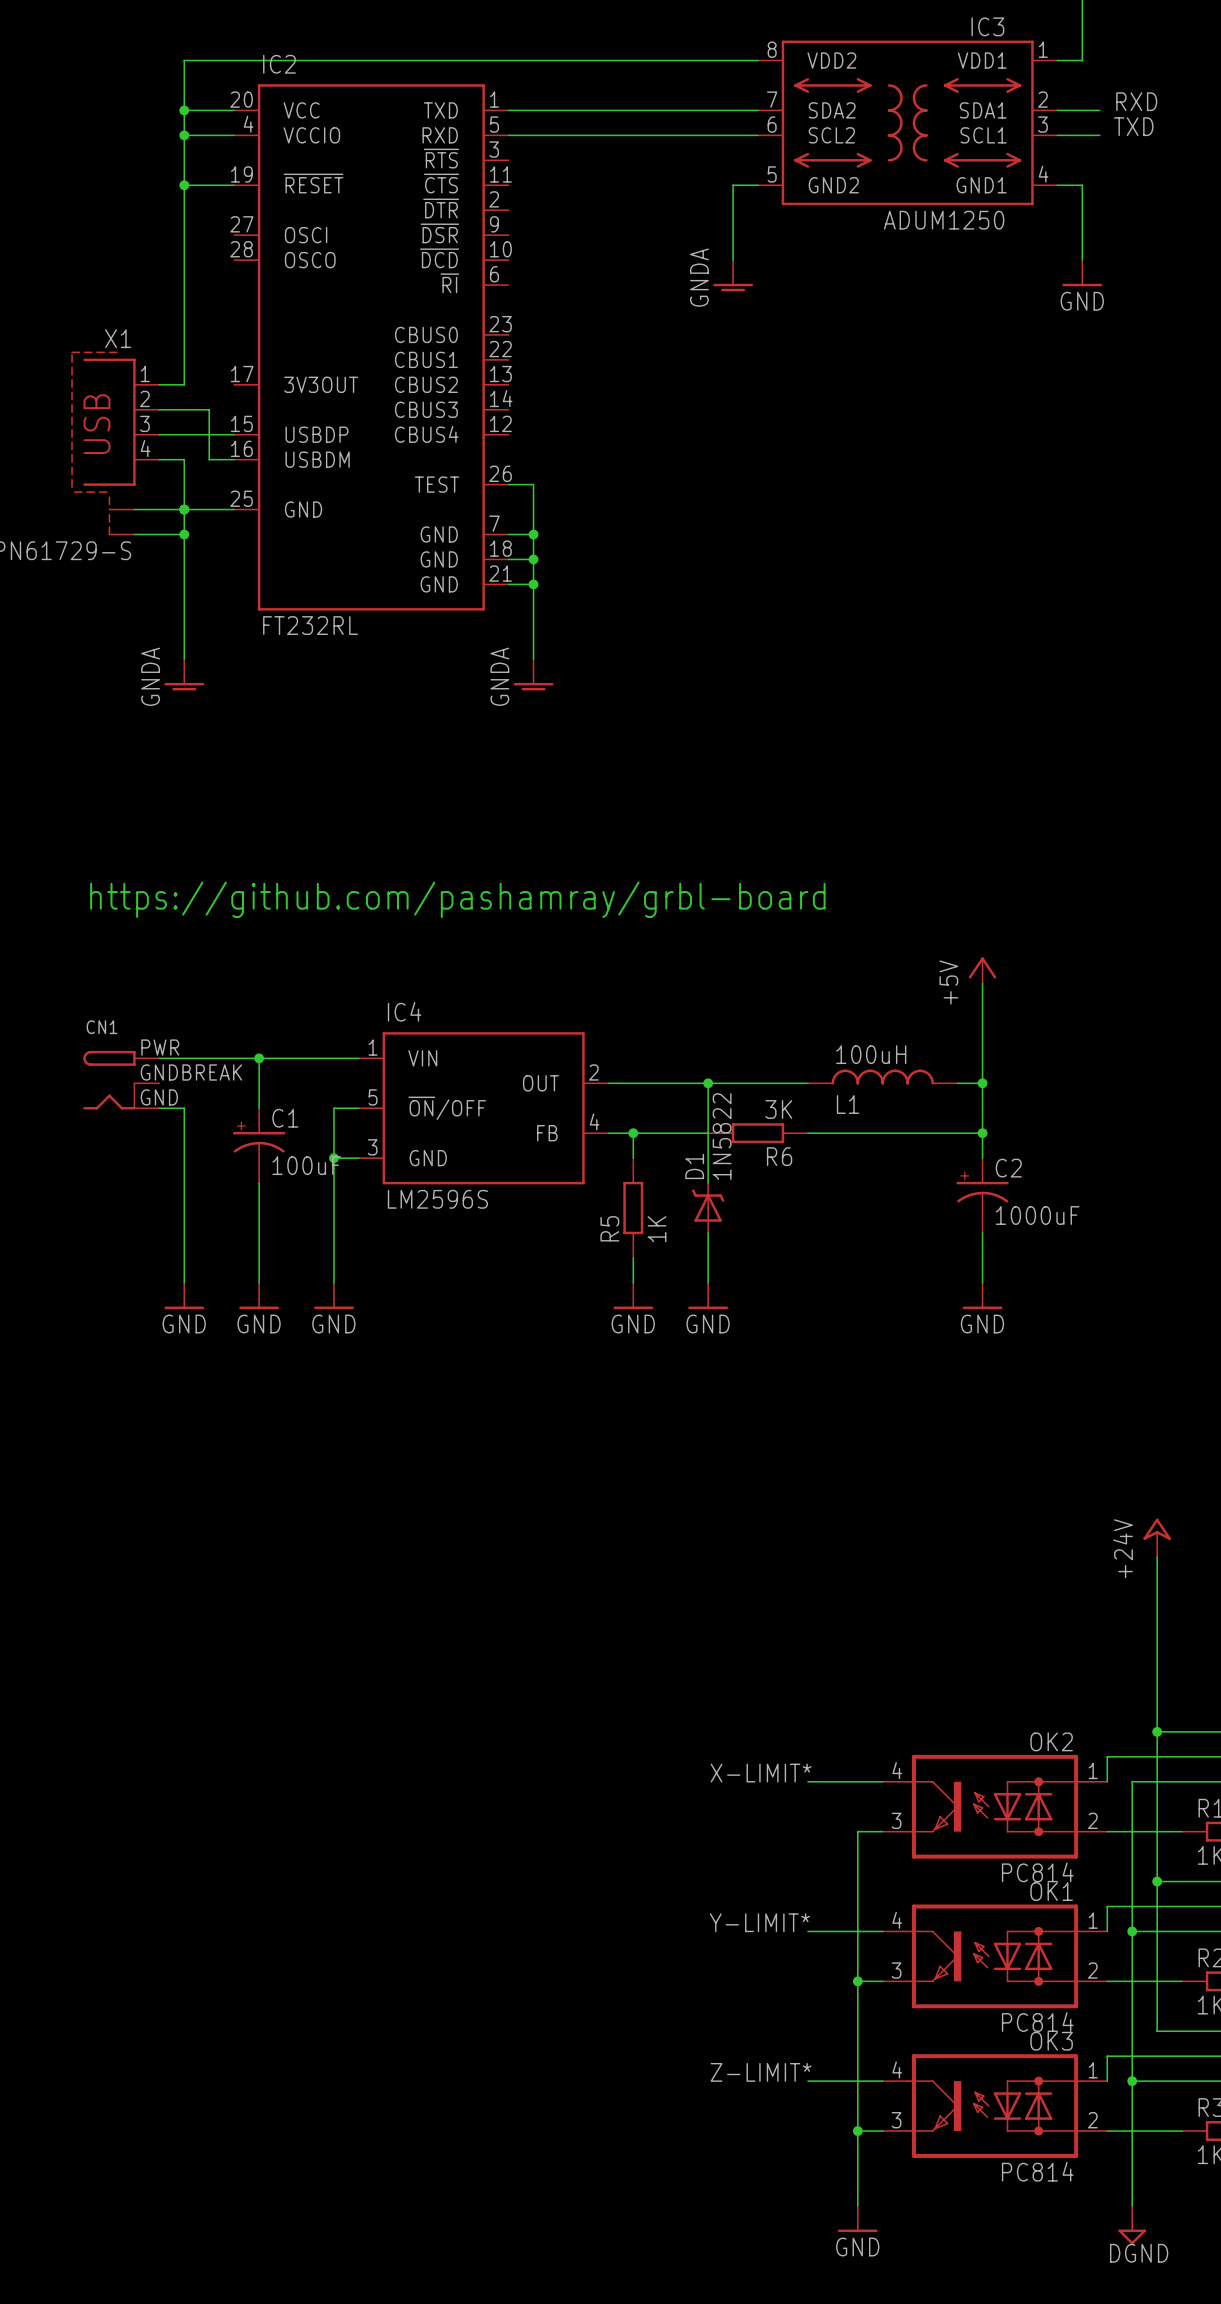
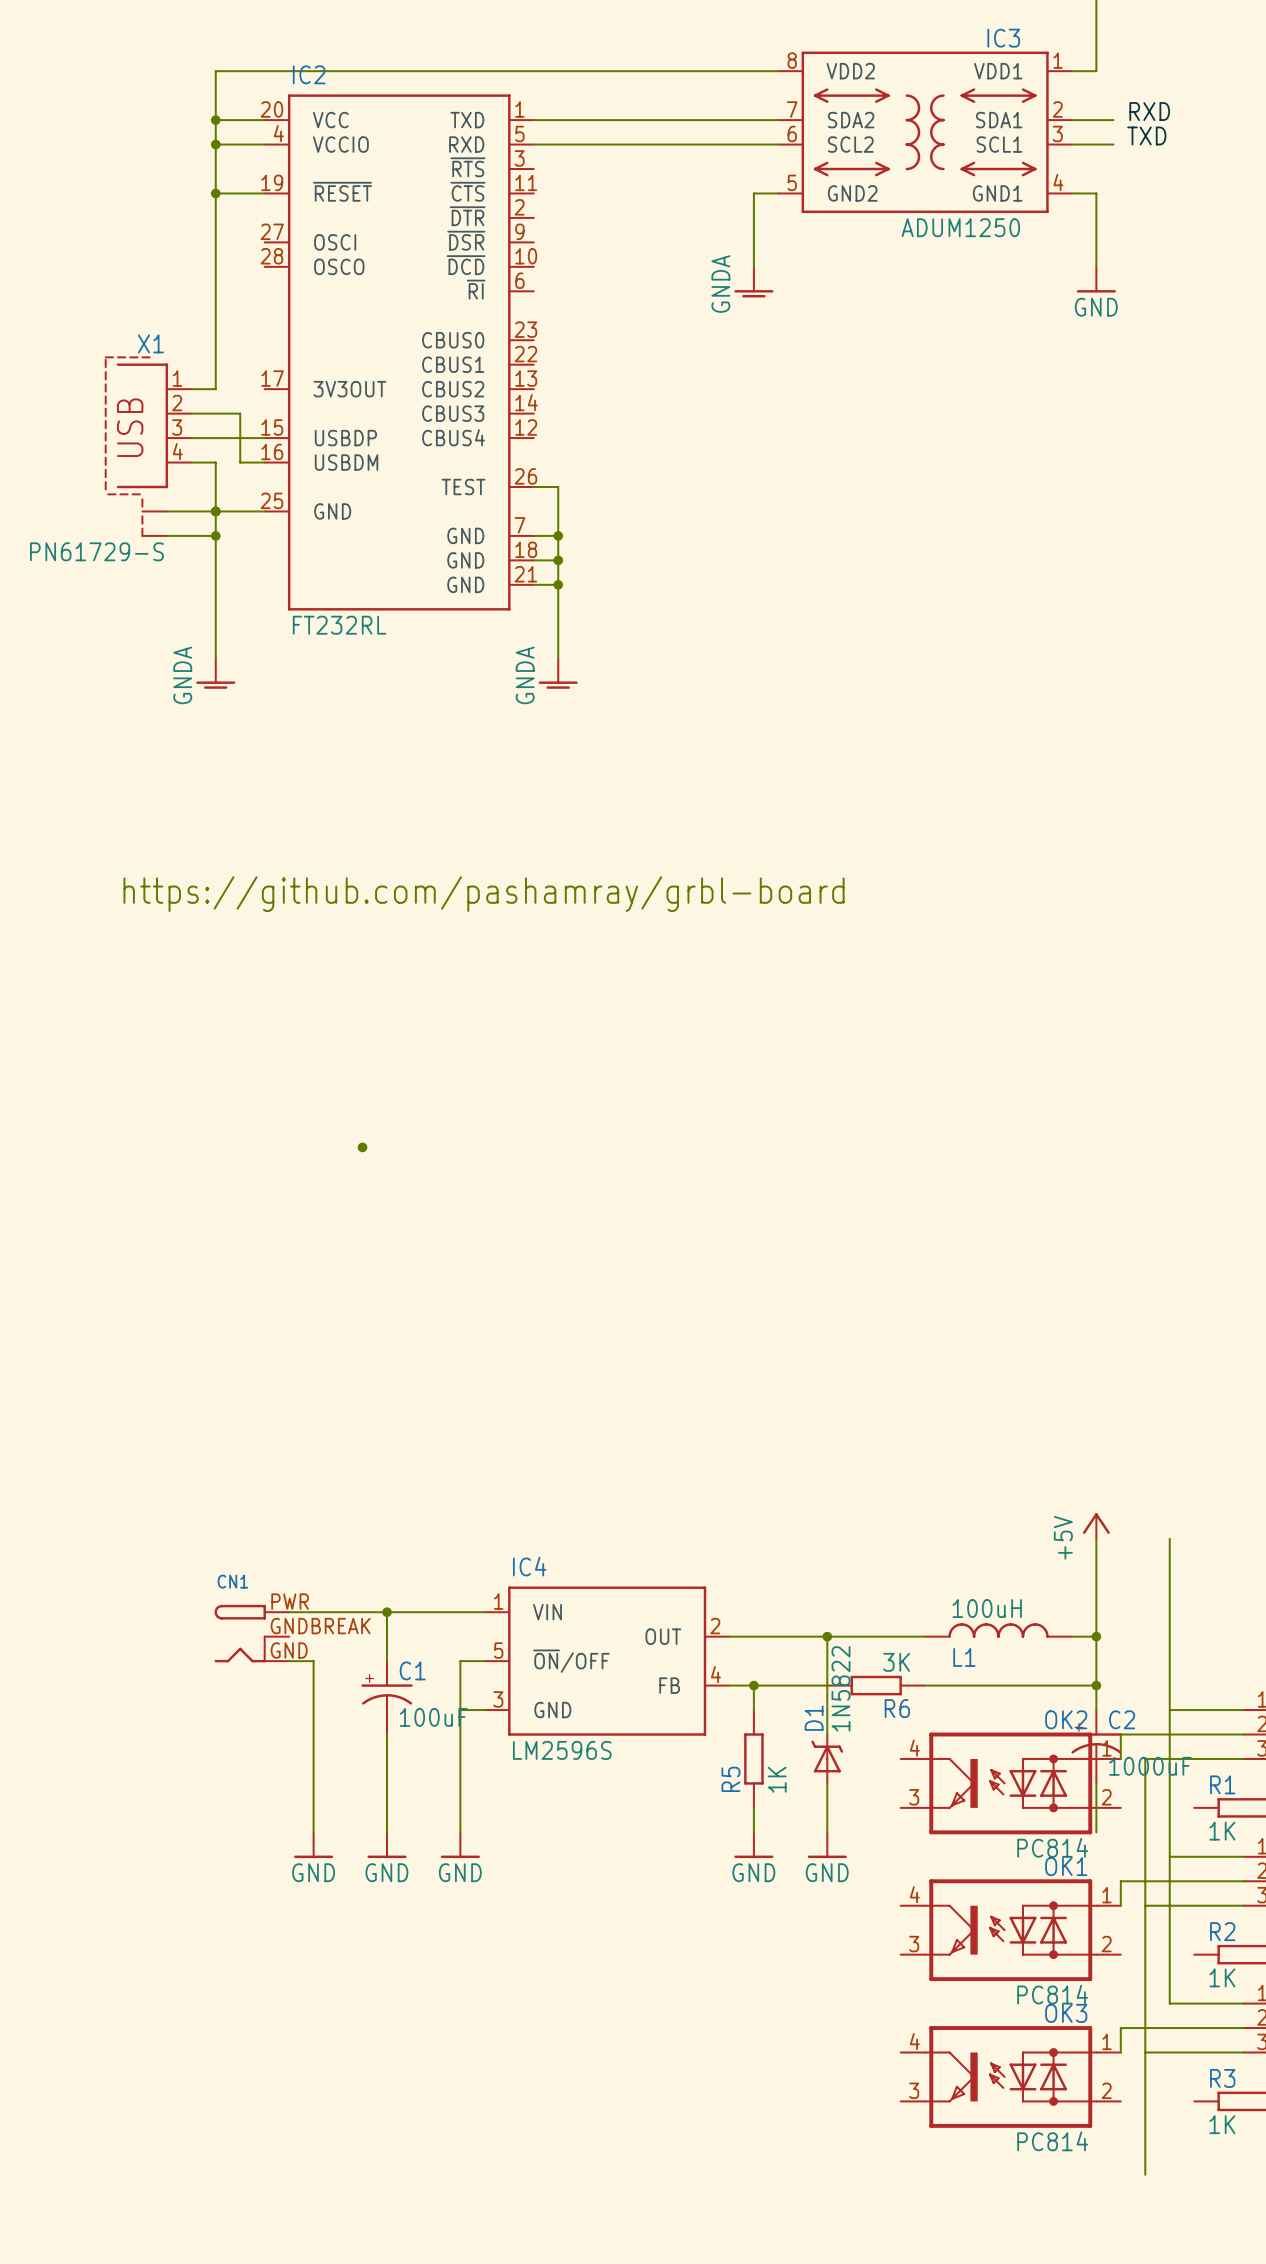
power symbol: +5V (982, 970) -> none
wire: (982, 983) (982, 1158) -> none
wire: (159, 1058) (358, 1058) -> none
wire: (259, 1058) (259, 1108) -> none
junction: (259, 1058) -> none
L1 position: (882, 1077) -> (998, 1630)
CN1 position: (121, 1080) -> (251, 1633)
wire: (608, 1083) (807, 1083) -> none
wire: (708, 1083) (708, 1183) -> none
junction: (708, 1083) -> none
wire: (957, 1083) (982, 1083) -> none
junction: (982, 1083) -> none
wire: (159, 1108) (184, 1108) (184, 1282) -> none
wire: (358, 1108) (333, 1108) (333, 1282) -> none
IC4 position: (483, 1108) -> (607, 1661)
wire: (608, 1133) (708, 1133) -> none
wire: (633, 1133) (633, 1158) -> none
junction: (633, 1133) -> none
R6 position: (758, 1133) -> (876, 1685)
wire: (807, 1133) (982, 1133) -> none
junction: (982, 1133) -> none
C1 position: (259, 1145) -> (387, 1697)
wire: (333, 1158) (358, 1158) -> none
wire: (259, 1183) (259, 1282) -> none
C2 position: (982, 1195) -> (1096, 1746)
R5 position: (633, 1208) -> (753, 1758)
D1 position: (708, 1208) -> (827, 1758)
wire: (708, 1232) (708, 1282) -> none
wire: (982, 1232) (982, 1282) -> none
wire: (633, 1257) (633, 1282) -> none
power symbol: GND (184, 1295) -> none
power symbol: GND (259, 1295) -> none
power symbol: GND (333, 1295) -> none
power symbol: GND (633, 1295) -> none
power symbol: GND (708, 1295) -> none
power symbol: GND (982, 1295) -> none
power symbol: +24V (1157, 1537) -> none
power symbol: none -> +5V (1096, 1525)
wire: none -> (1096, 1538) (1096, 1710)
wire: none -> (289, 1612) (484, 1612)
wire: none -> (387, 1612) (387, 1661)
junction: none -> (387, 1612)
wire: none -> (729, 1636) (925, 1636)
wire: none -> (827, 1636) (827, 1734)
junction: none -> (827, 1636)
wire: none -> (1071, 1636) (1096, 1636)
junction: none -> (1096, 1636)
wire: none -> (289, 1661) (313, 1661) (313, 1832)
wire: none -> (484, 1661) (460, 1661) (460, 1832)
wire: none -> (729, 1685) (827, 1685)
wire: none -> (753, 1685) (753, 1710)
junction: none -> (753, 1685)
wire: none -> (925, 1685) (1096, 1685)
junction: none -> (1096, 1685)
wire: none -> (460, 1710) (484, 1710)
junction: (1157, 1731) -> none
wire: none -> (387, 1734) (387, 1832)
label: X-LIMIT* (761, 1773) -> none
wire: (807, 1781) (882, 1781) -> none
wire: none -> (827, 1783) (827, 1832)
wire: none -> (1096, 1783) (1096, 1832)
wire: none -> (753, 1807) (753, 1832)
wire: (882, 1831) (857, 1831) (857, 2205) -> none
wire: (1107, 1831) (1182, 1831) -> none
power symbol: none -> GND (313, 1845)
power symbol: none -> GND (387, 1845)
power symbol: none -> GND (460, 1845)
power symbol: none -> GND (753, 1845)
power symbol: none -> GND (827, 1845)
junction: (1157, 1881) -> none
label: Y-LIMIT* (759, 1922) -> none
wire: (807, 1931) (882, 1931) -> none
junction: (1132, 1931) -> none
wire: (857, 1981) (882, 1981) -> none
junction: (857, 1981) -> none
wire: (1107, 1981) (1182, 1981) -> none
label: Z-LIMIT* (761, 2072) -> none
wire: (807, 2081) (882, 2081) -> none
junction: (1132, 2081) -> none
wire: (857, 2131) (882, 2131) -> none
junction: (857, 2131) -> none
wire: (1107, 2131) (1182, 2131) -> none
power symbol: GND (857, 2218) -> none
power symbol: DGND (1132, 2225) -> none

